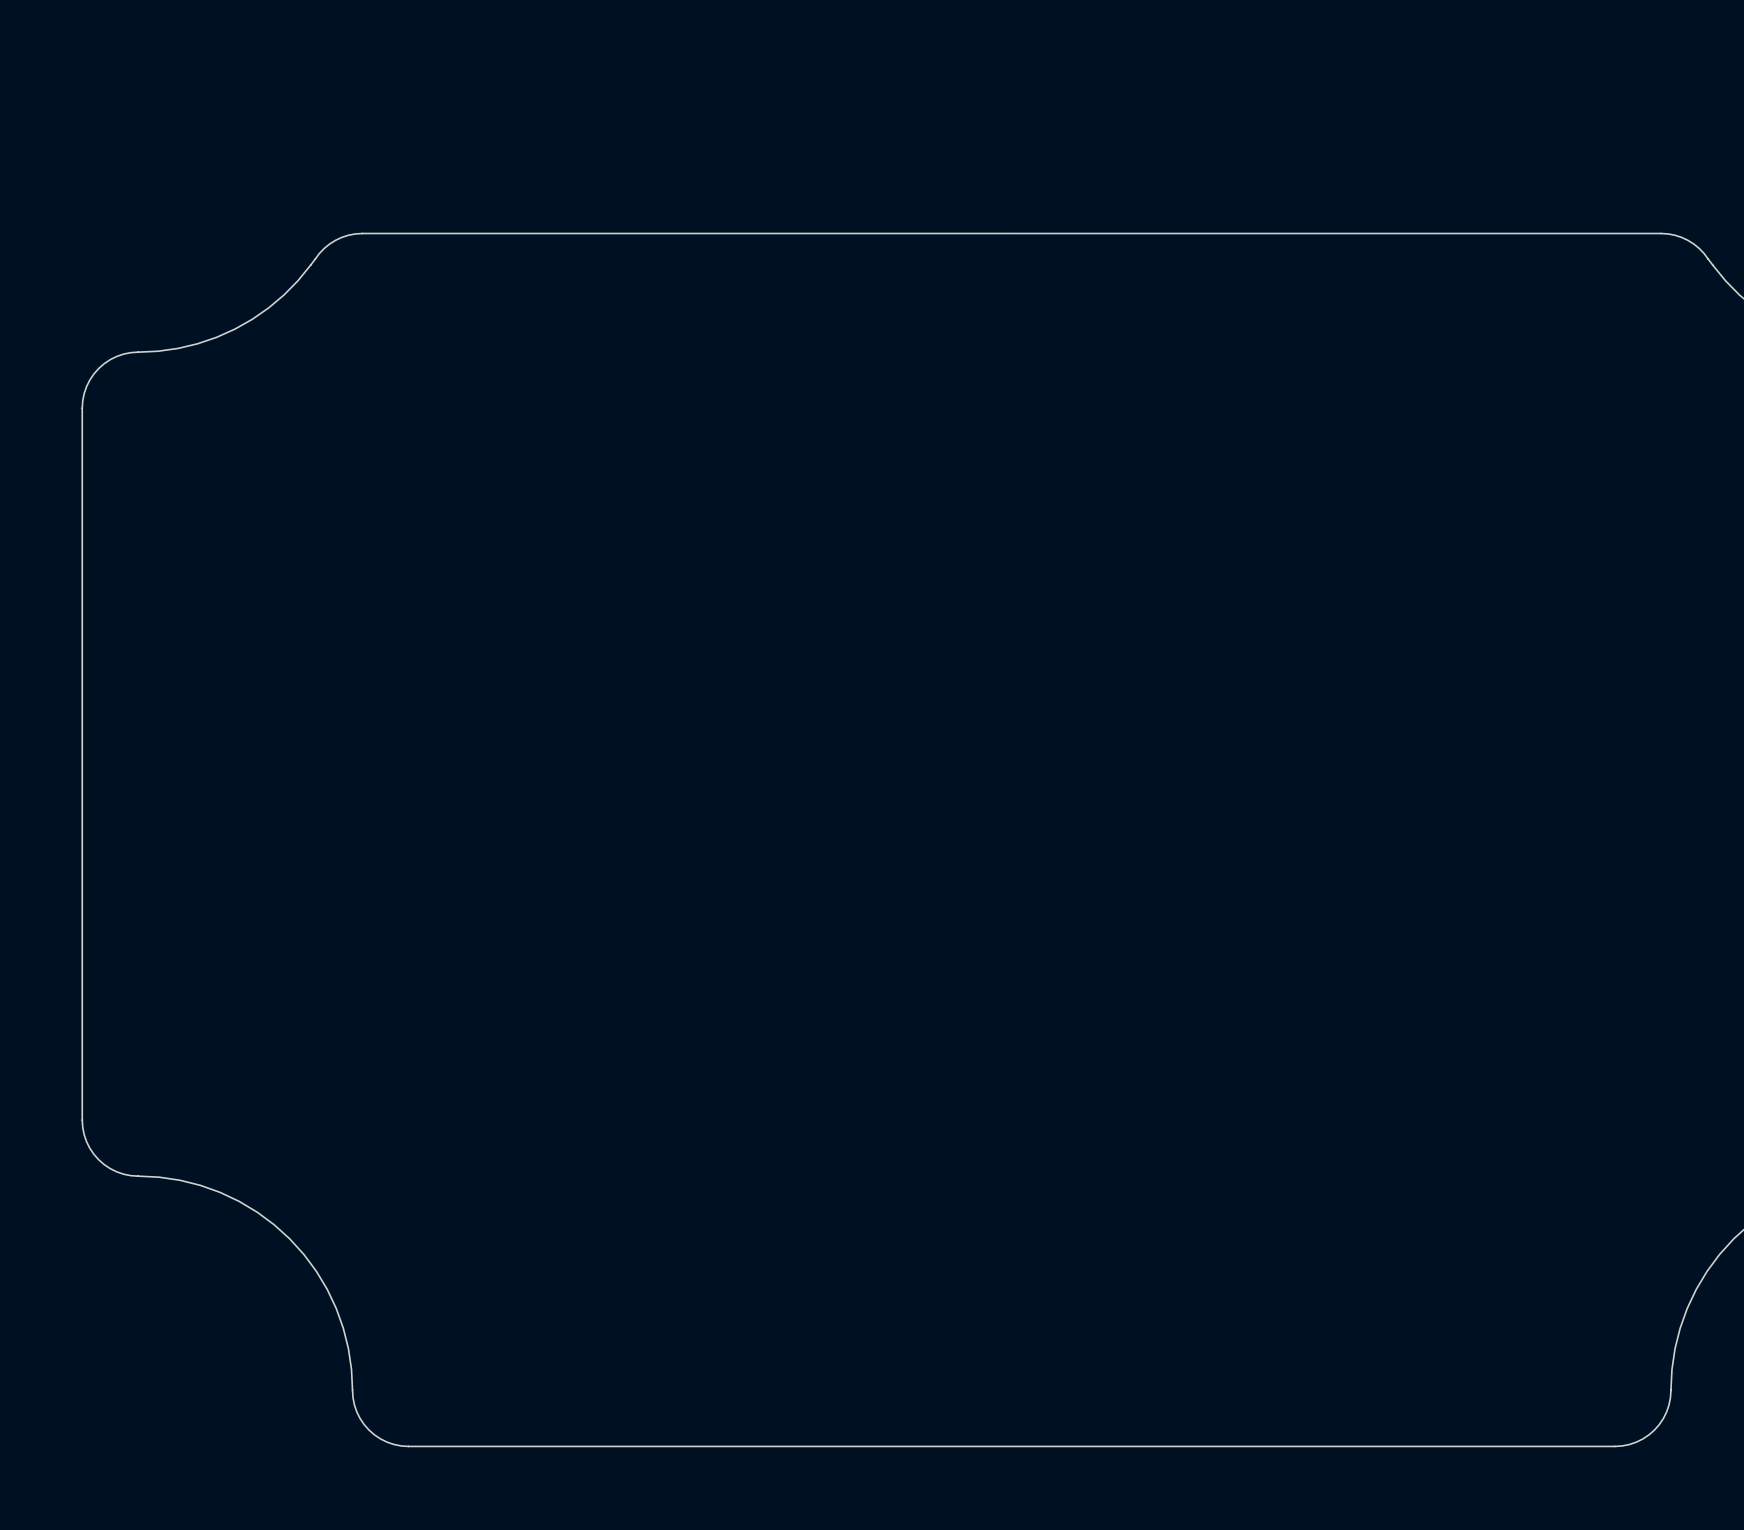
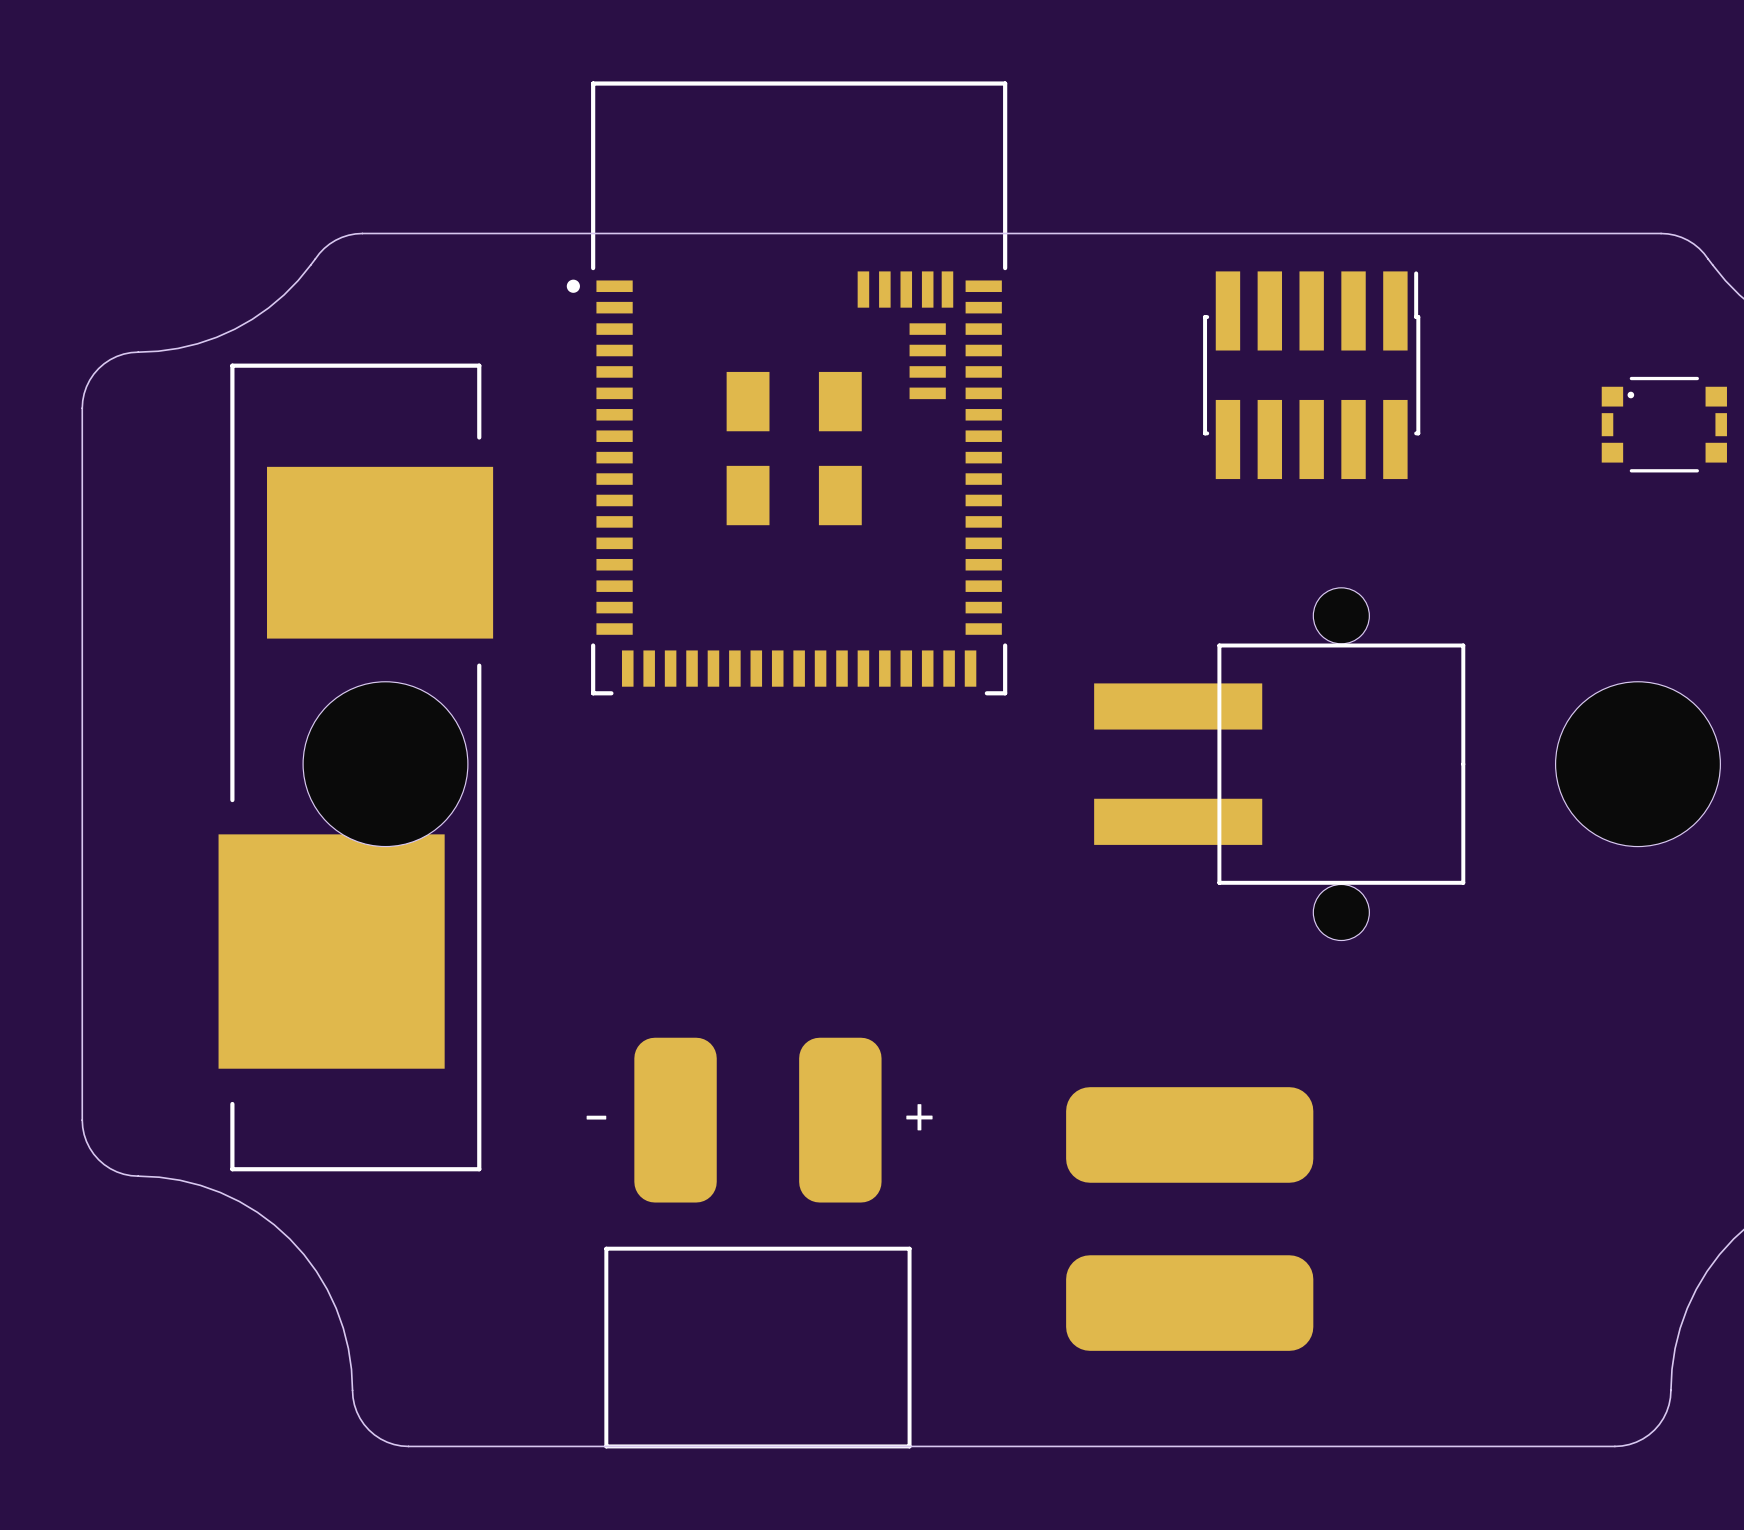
part: none -> (1311, 375)
part: none -> (787, 388)
part: none -> (1664, 424)
part: none -> (385, 764)
part: none -> (1279, 764)
part: none -> (1637, 764)
part: none -> (355, 767)
part: none -> (1189, 1219)
part: none -> (757, 1243)

